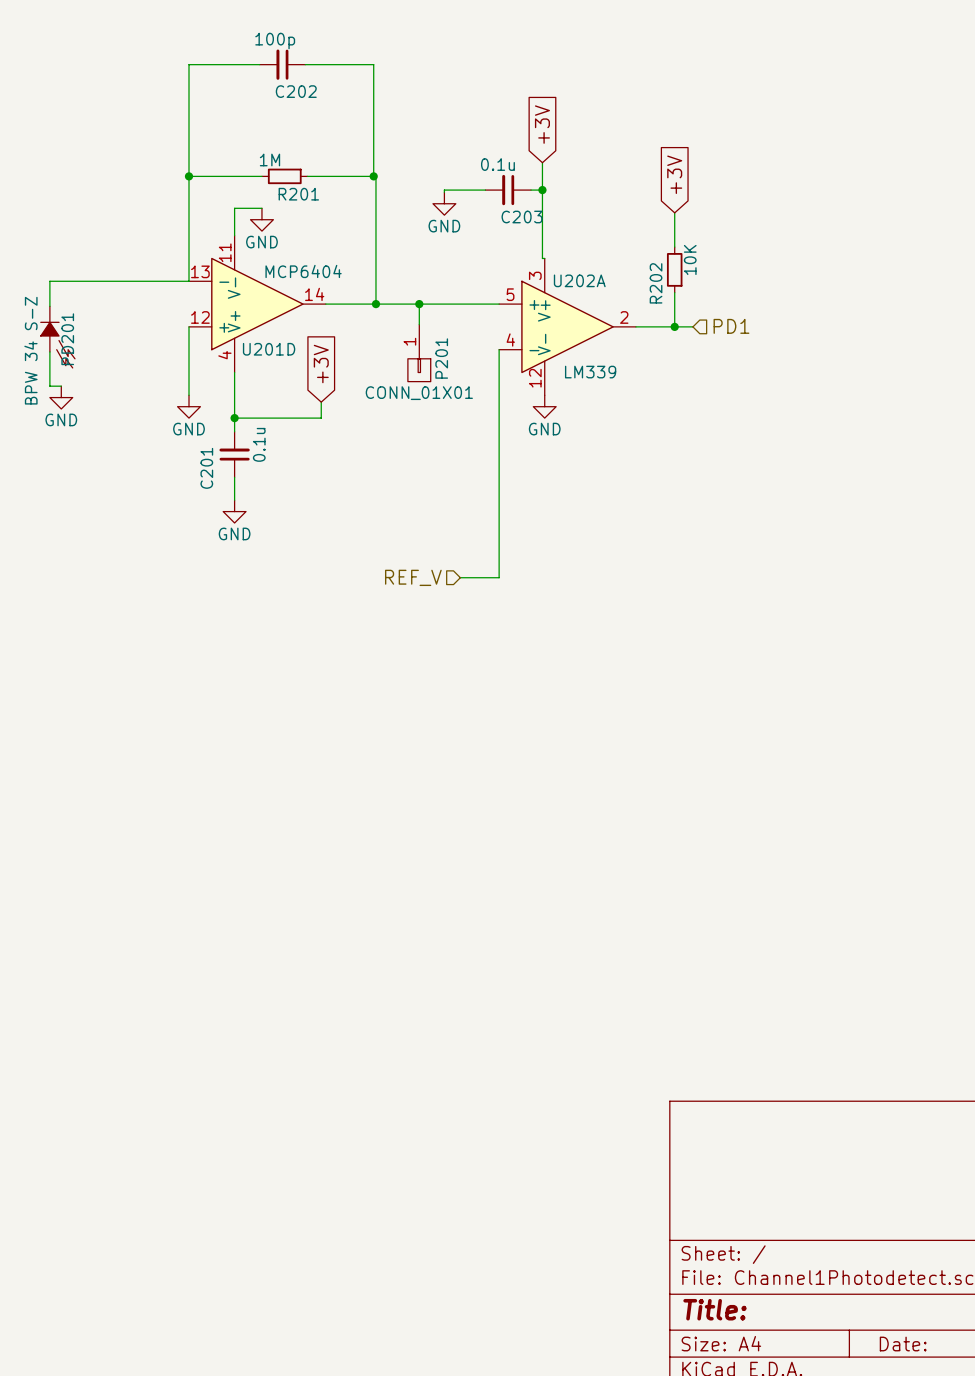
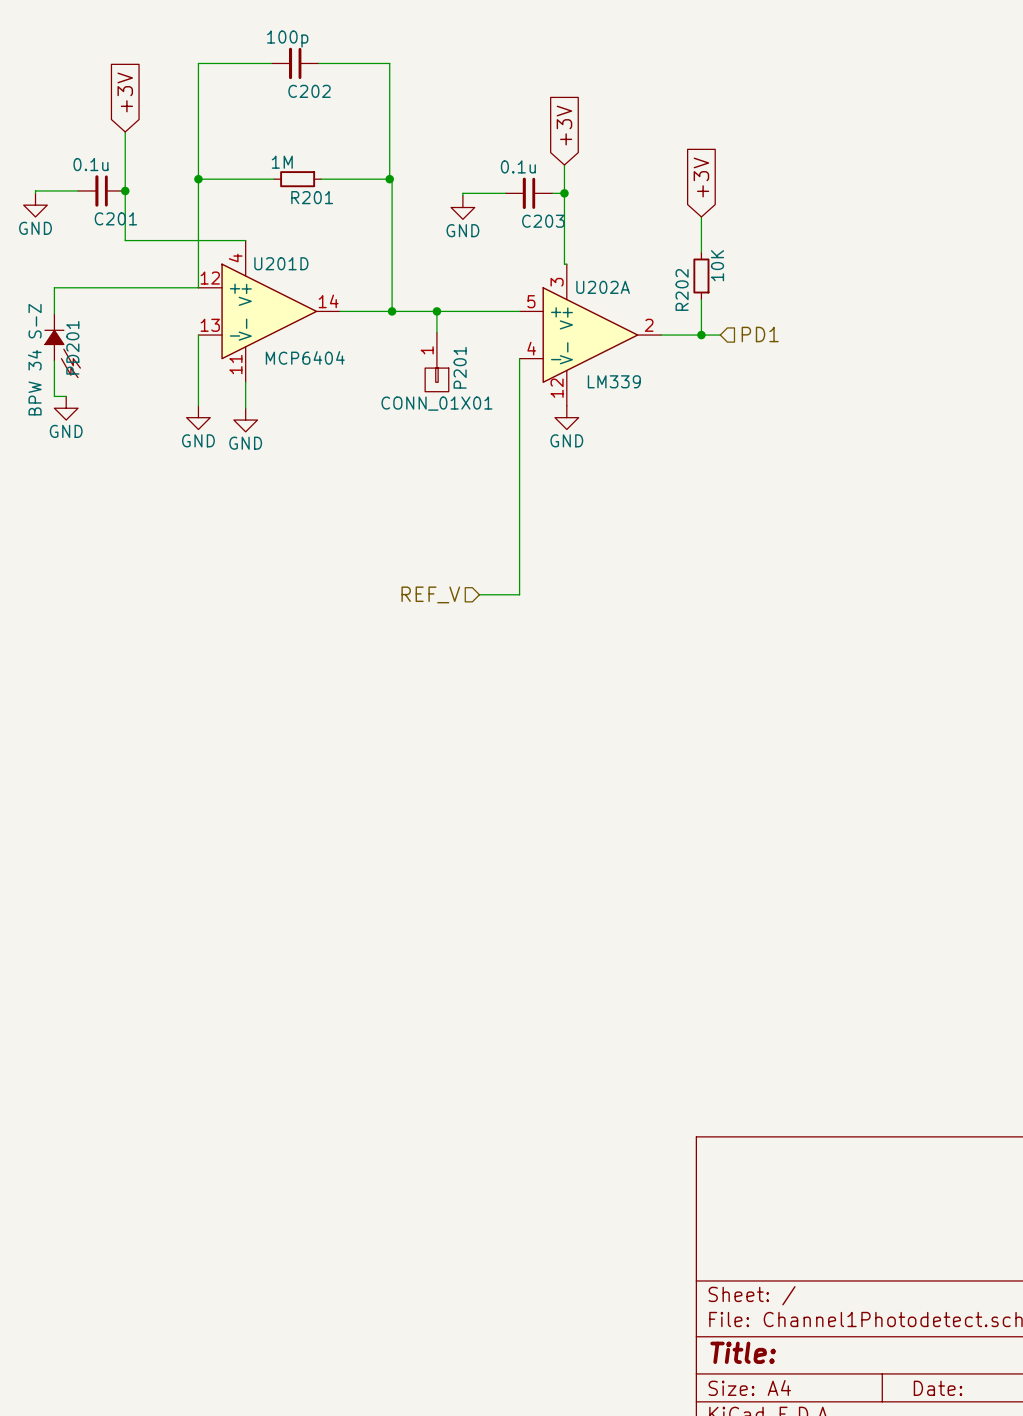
global label: none -> +3V (125, 92)
wire: none -> (78, 190) (35, 190) (35, 193)
junction: none -> (125, 190)
power symbol: none -> GND (35, 205)
wire: (261, 208) (234, 208) (234, 235) -> (125, 131) (125, 240) (245, 240)
power symbol: GND (261, 219) -> none
U201D value position: MCP6404 (303, 271) -> MCP6404 (305, 357)
U201D flip: as is (257, 304) -> up-down (269, 311)
global label: +3V (321, 364) -> none
wire: (234, 397) (234, 431) -> none
wire: (321, 402) (321, 418) (234, 418) -> none
power symbol: none -> GND (245, 420)
junction: (234, 418) -> none
C201 rotation: 0° (234, 454) -> 90° counterclockwise (101, 190)
C201 position: (234, 454) -> (101, 190)
wire: (234, 477) (234, 500) -> none
power symbol: GND (234, 511) -> none

